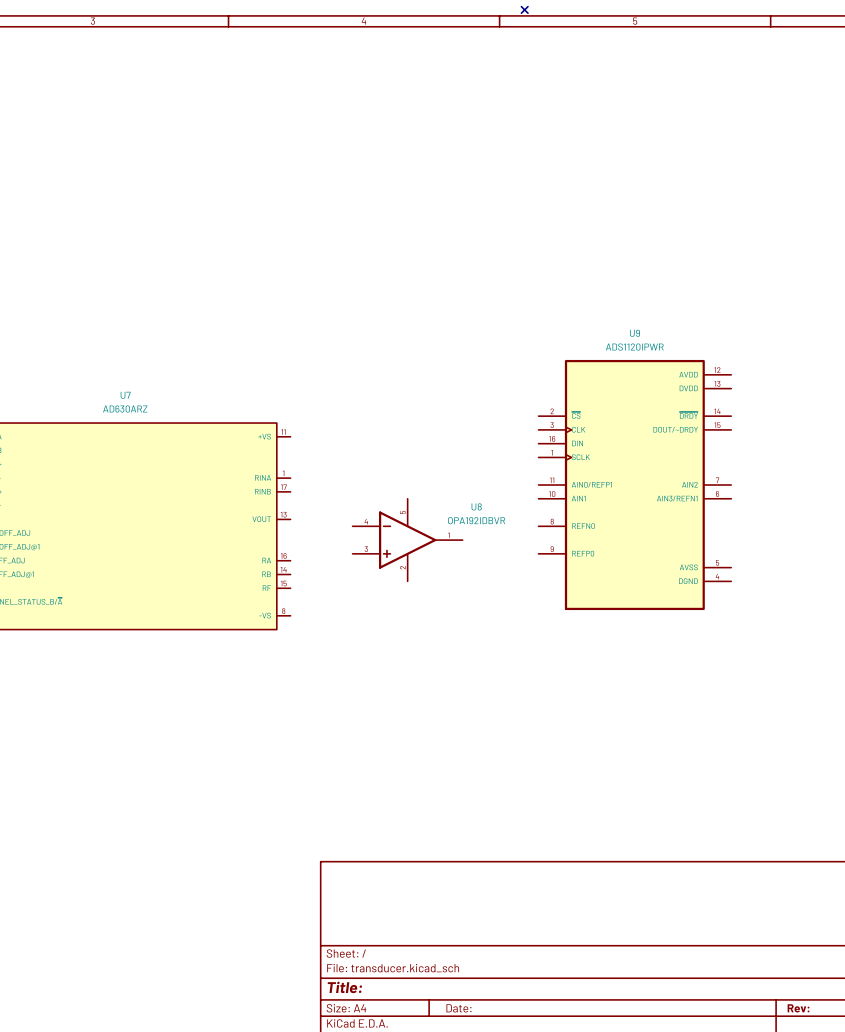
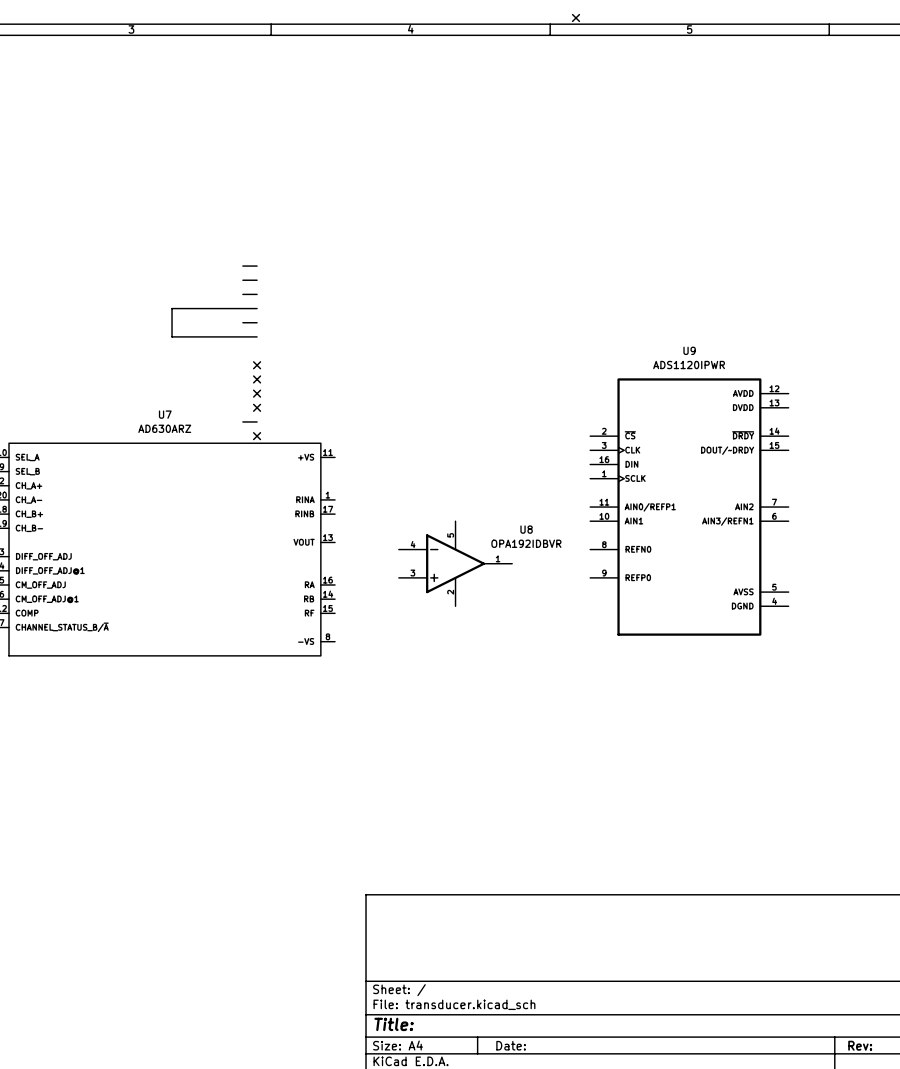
wire: none -> (242, 266) (257, 266)
wire: none -> (242, 280) (257, 280)
wire: none -> (242, 294) (257, 294)
wire: none -> (257, 308) (172, 308) (172, 336) (257, 336)
wire: none -> (242, 322) (257, 322)
no-connect mark: none -> (257, 365)
no-connect mark: none -> (257, 379)
no-connect mark: none -> (257, 393)
no-connect mark: none -> (257, 407)
wire: none -> (242, 421) (257, 421)
no-connect mark: none -> (257, 436)

